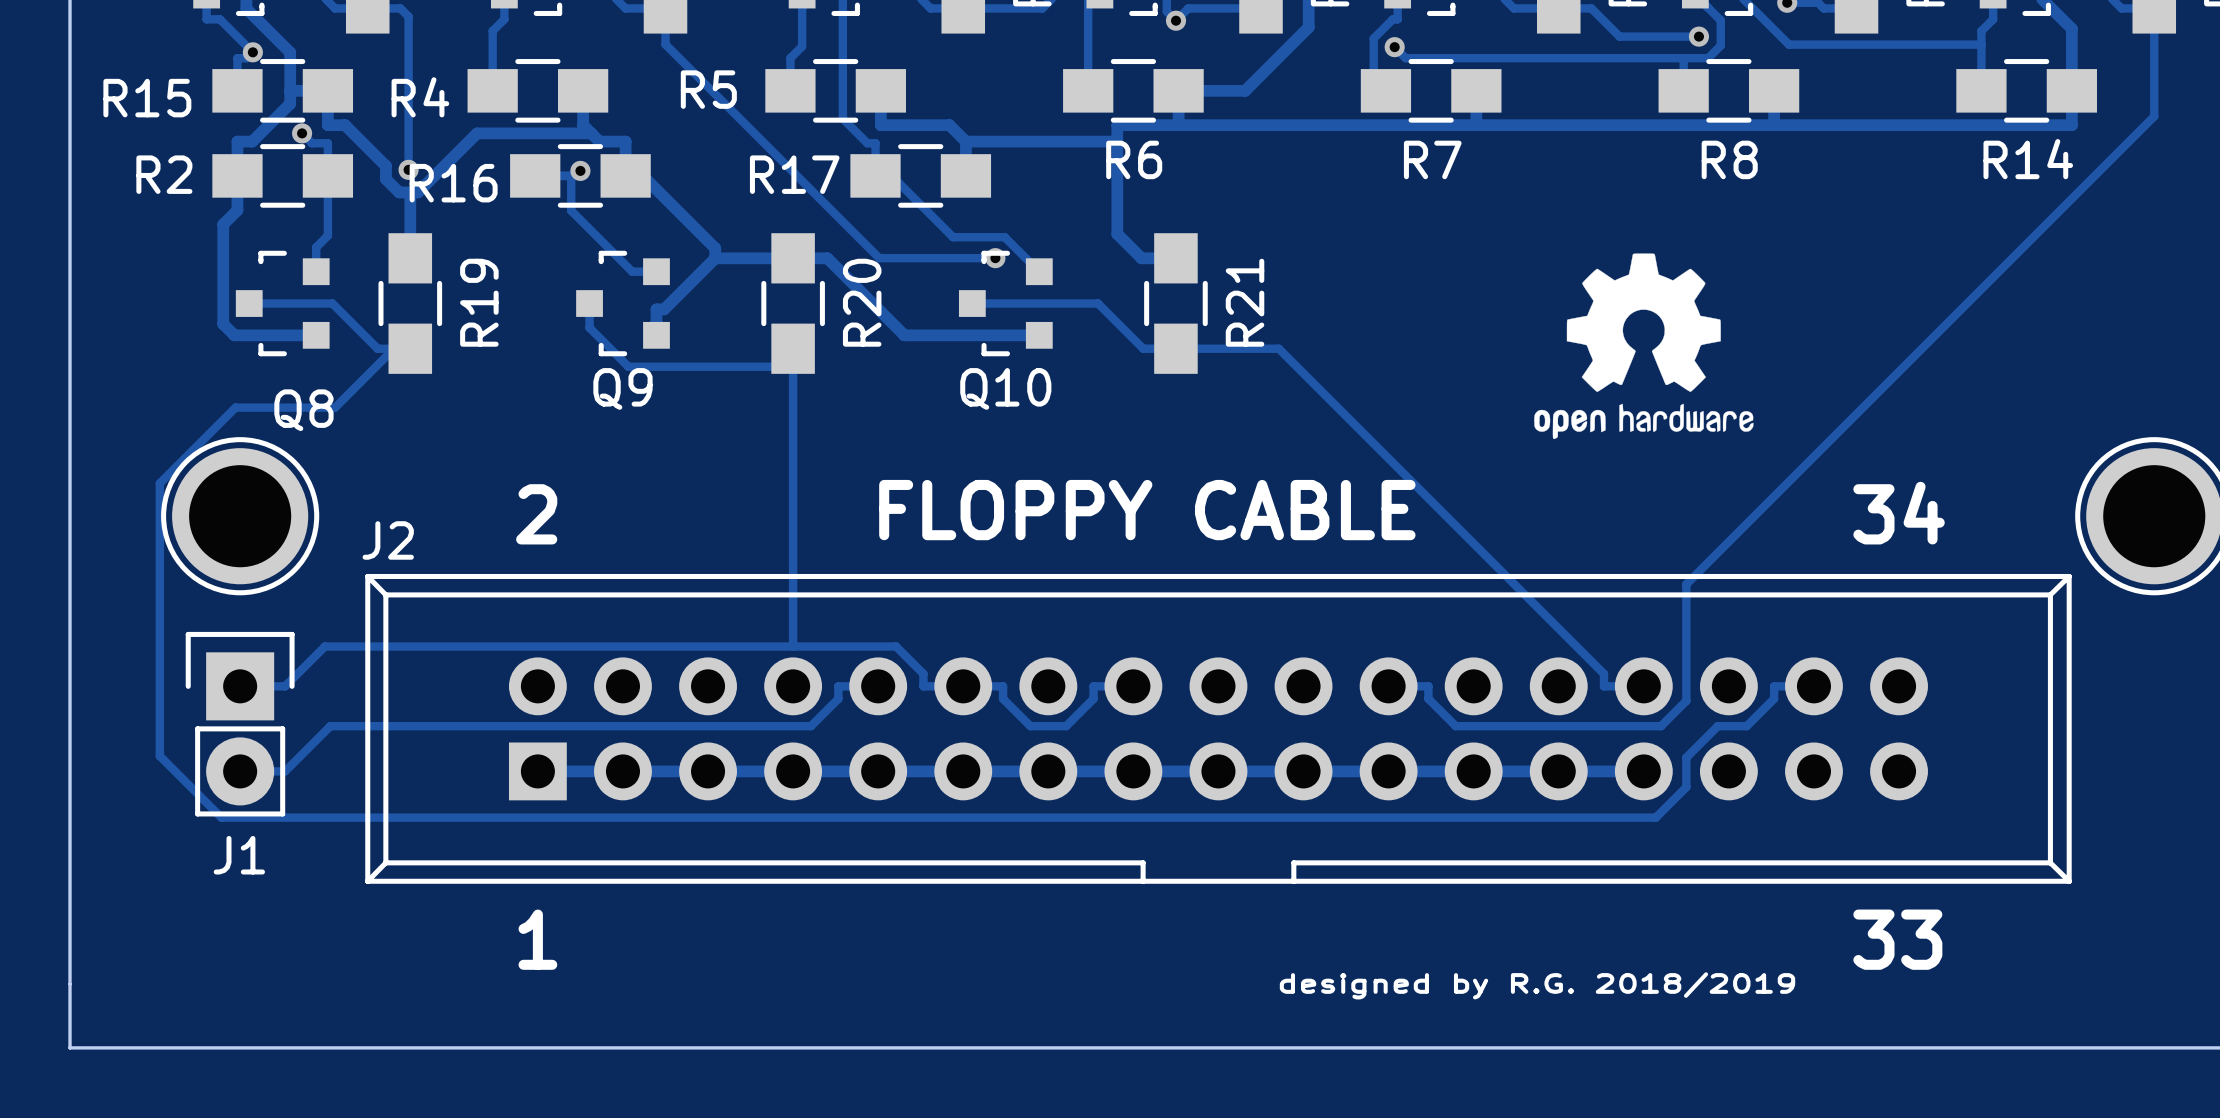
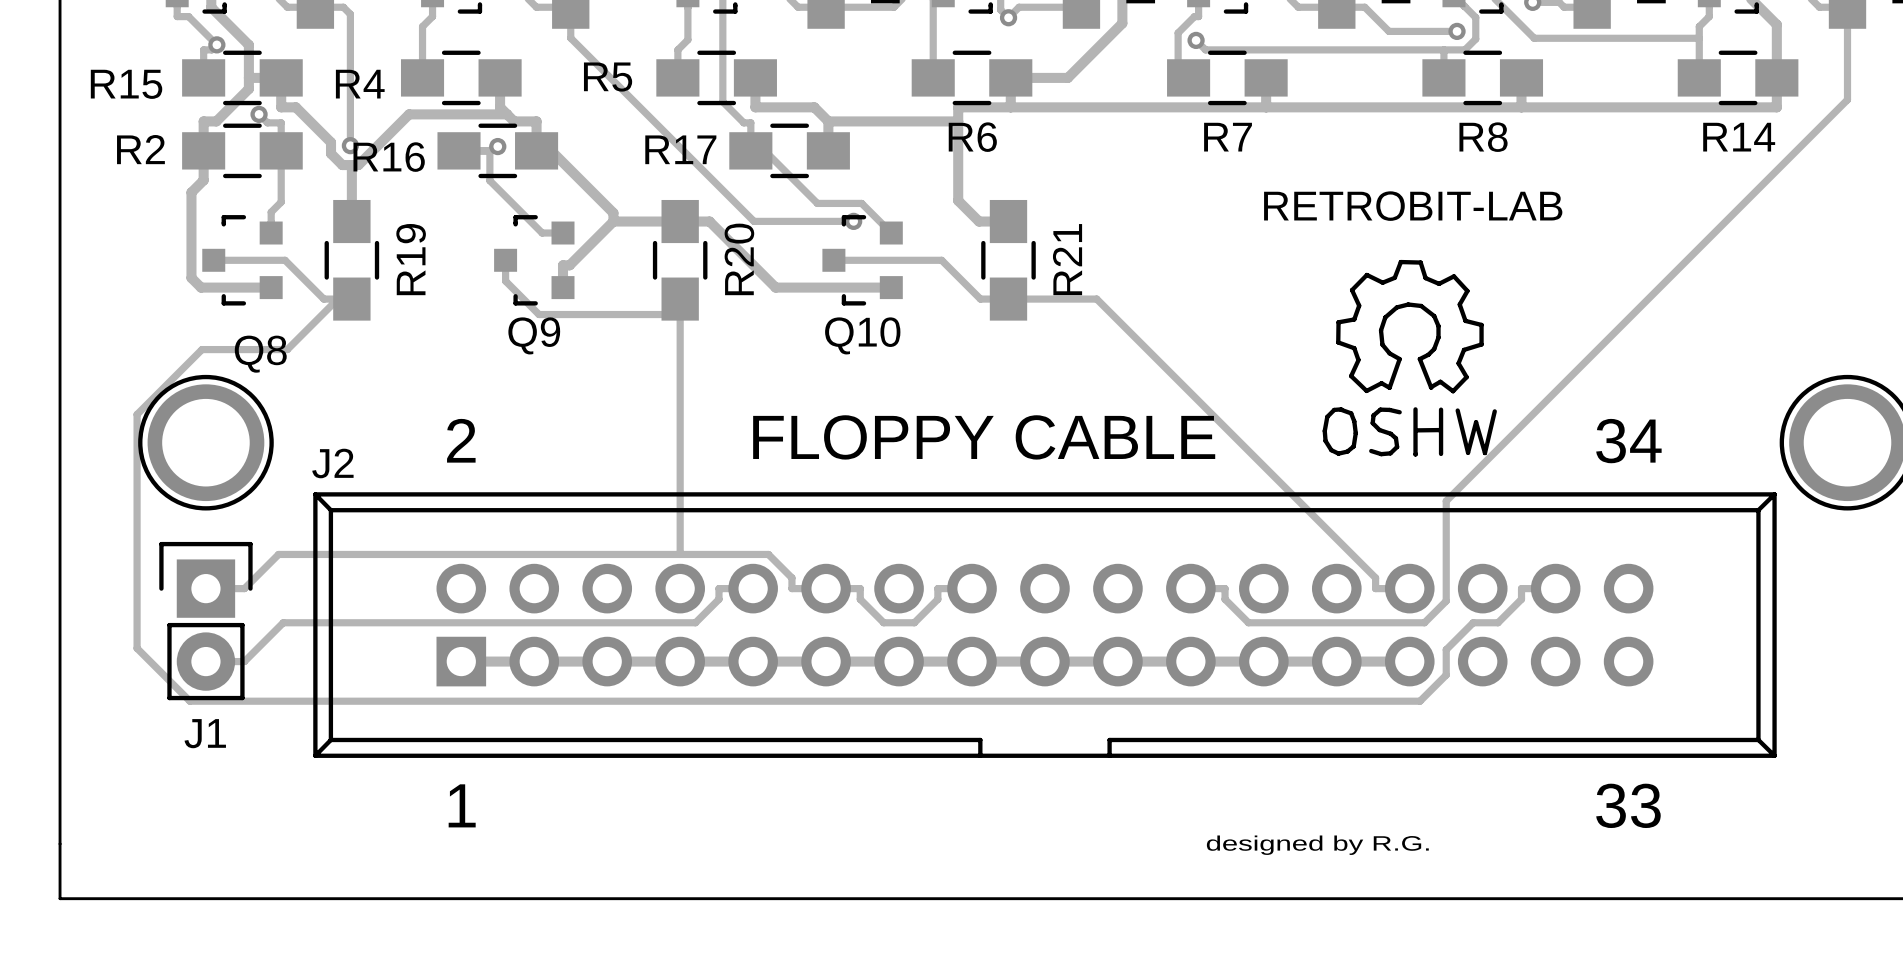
drawing: [1534, 253, 1754, 440] -> none
RETROBIT-LAB: none -> (1409, 358)
text: designed by R.G. 2018/2019 (1537, 985) -> designed by R.G. (1317, 845)

